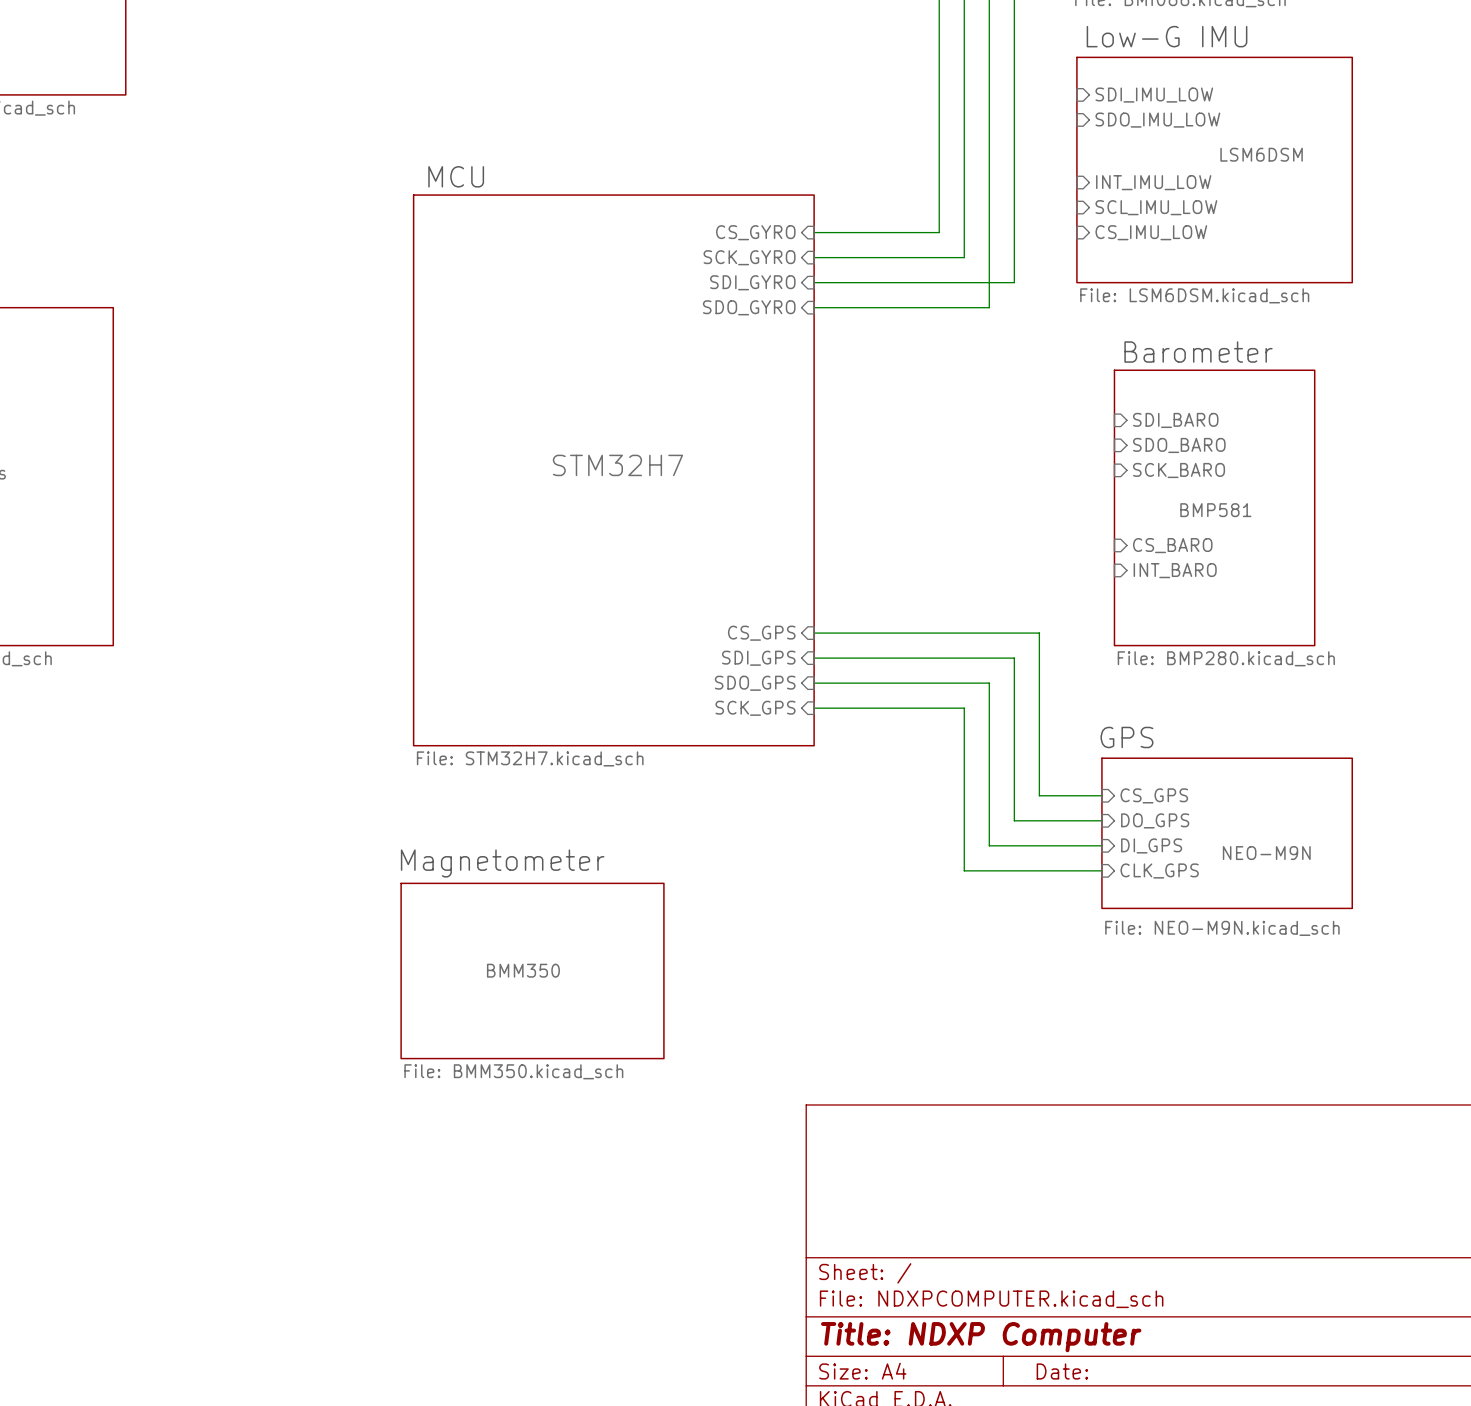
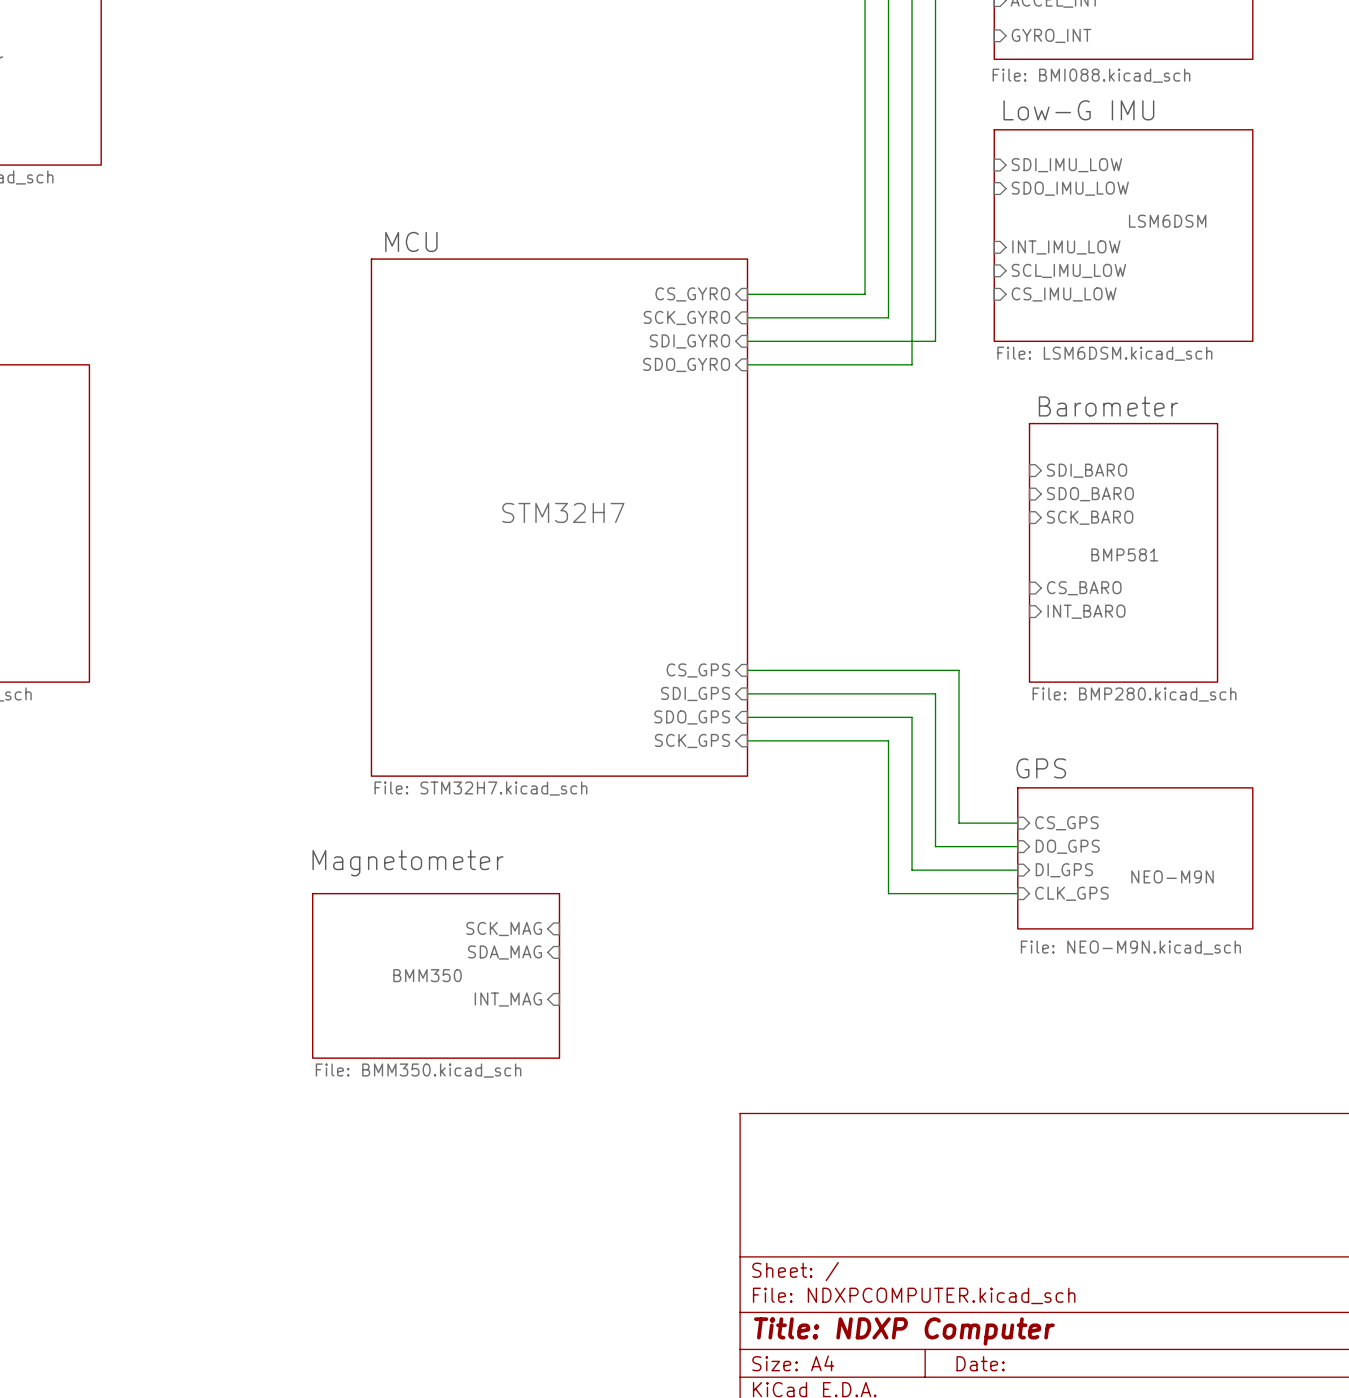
text position: Magnetometer (502, 863) -> Magnetometer (408, 863)
sheet pin: none -> SCK_MAG (504, 929)
sheet pin: none -> SDA_MAG (505, 952)
sheet BMM350 position: (532, 970) -> (436, 975)
sheet pin: none -> INT_MAG (508, 999)

